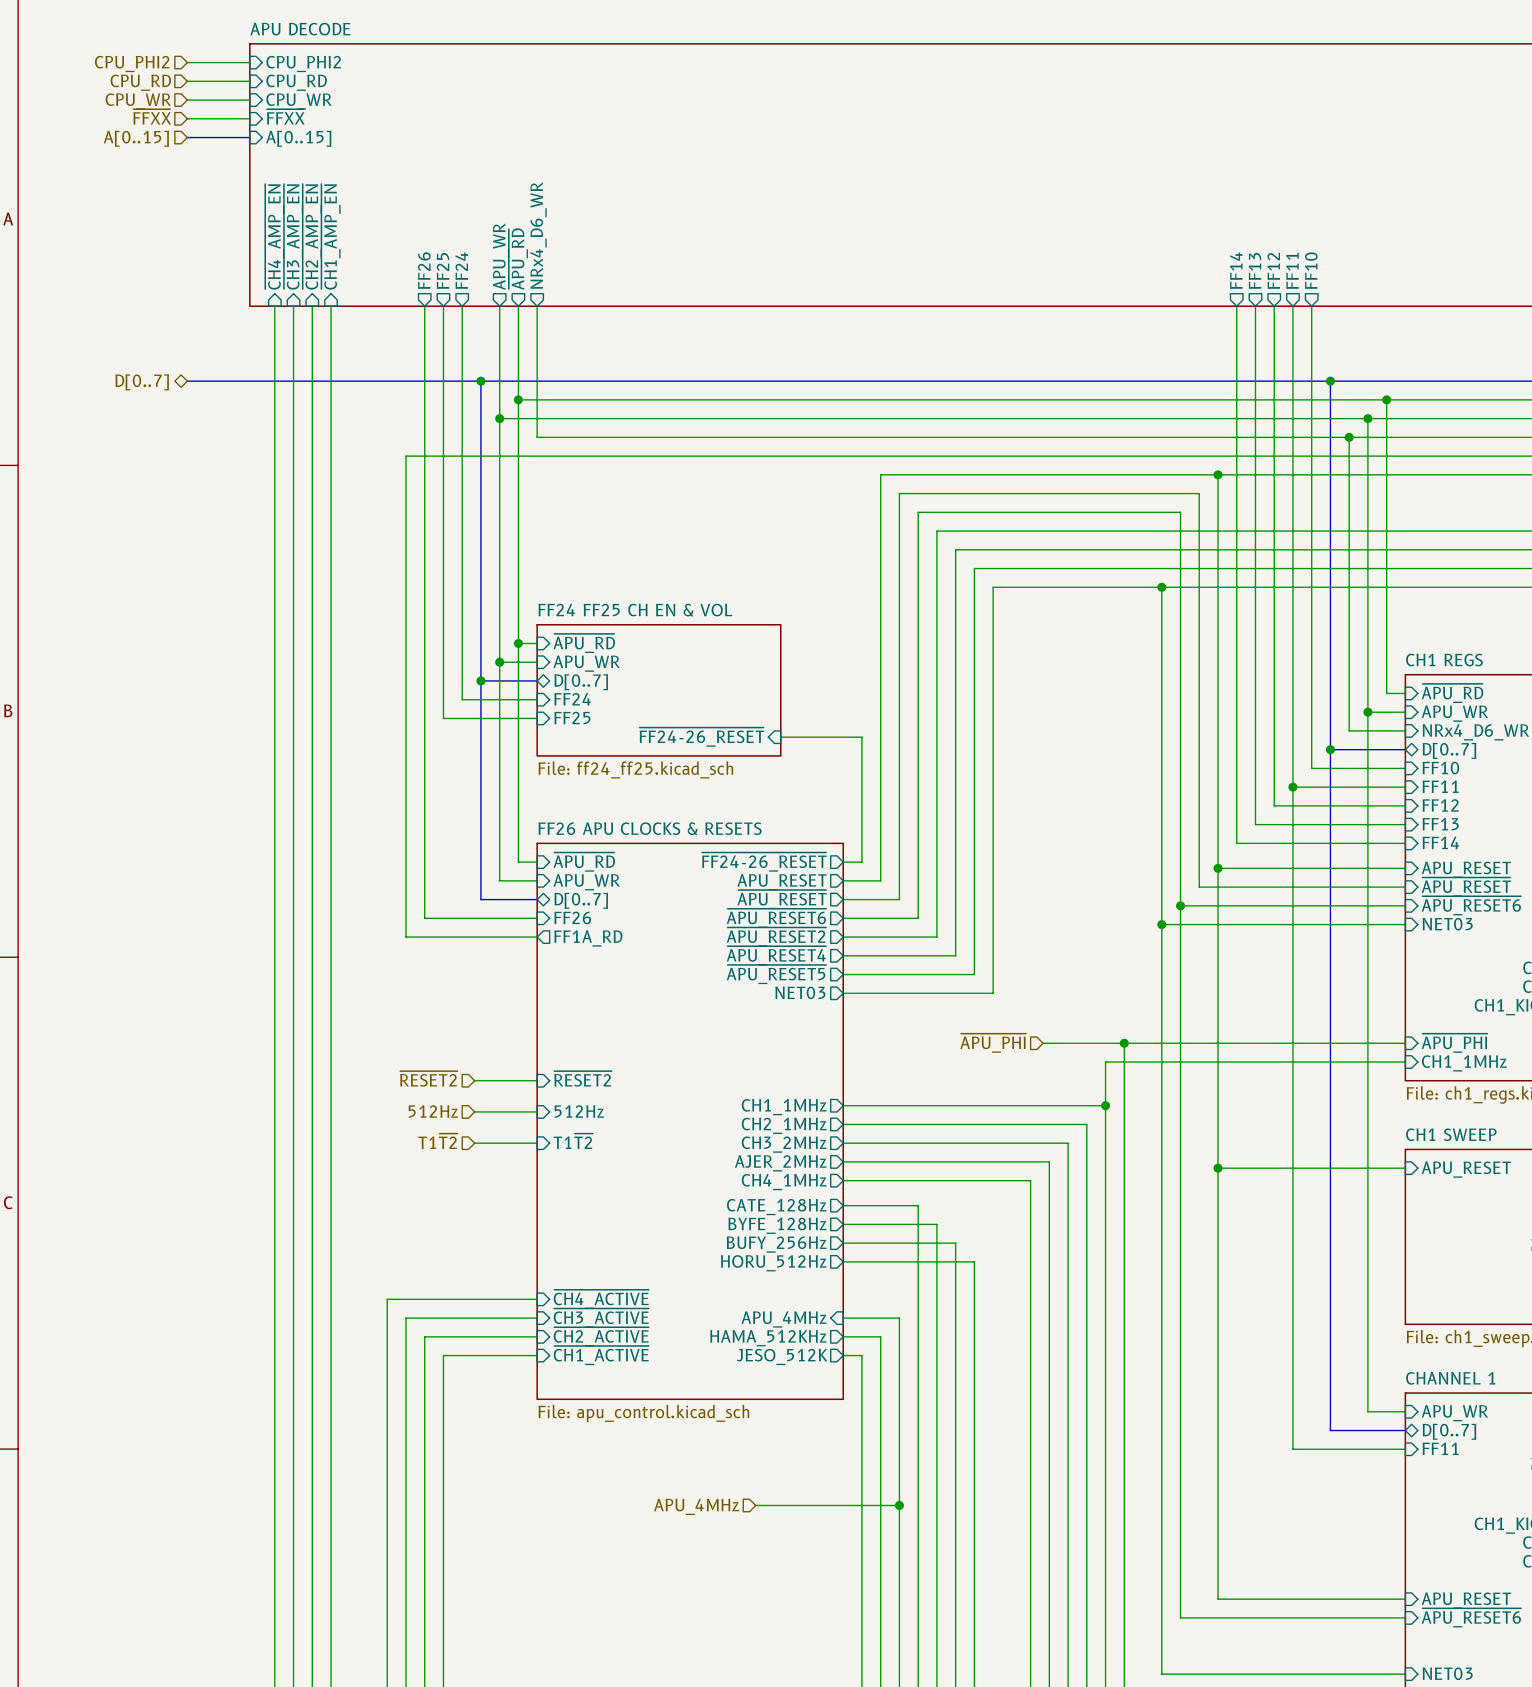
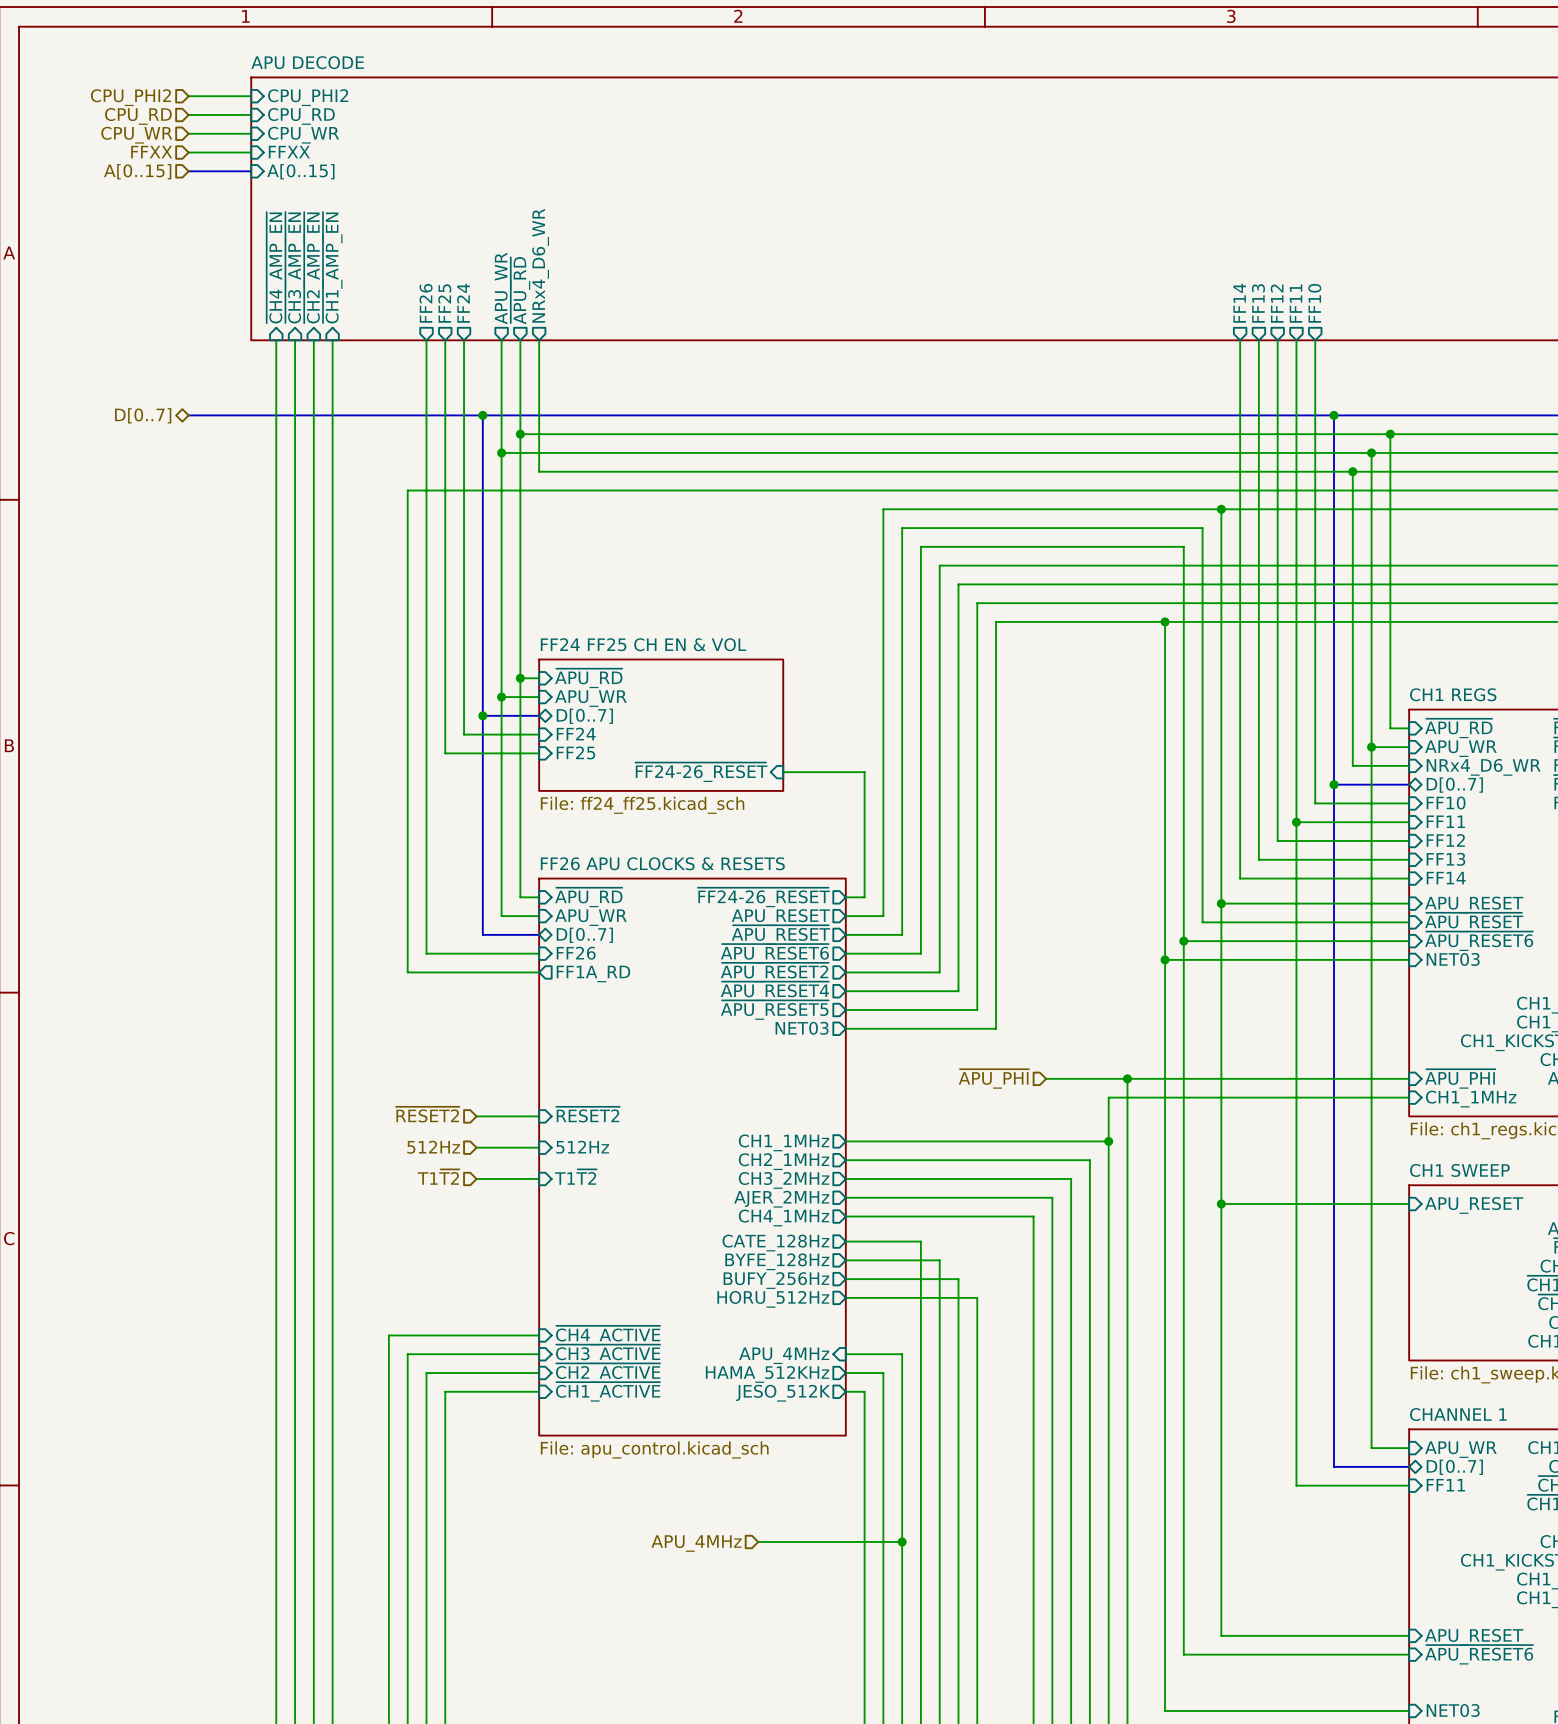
hierarchical label: ~{FFXX} (152, 116) -> FFXX (151, 152)
sheet pin: ~{FFXX} (285, 116) -> FFXX (289, 152)

